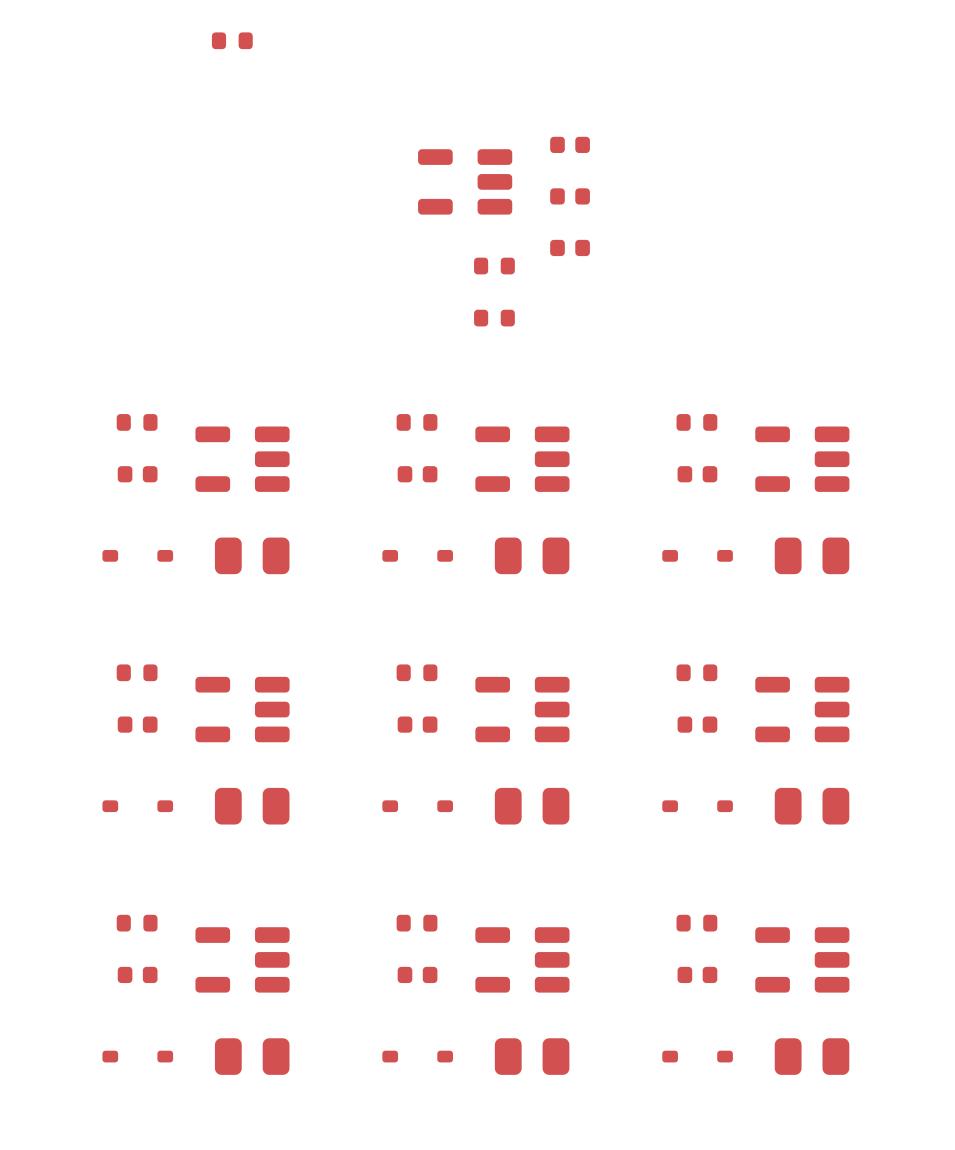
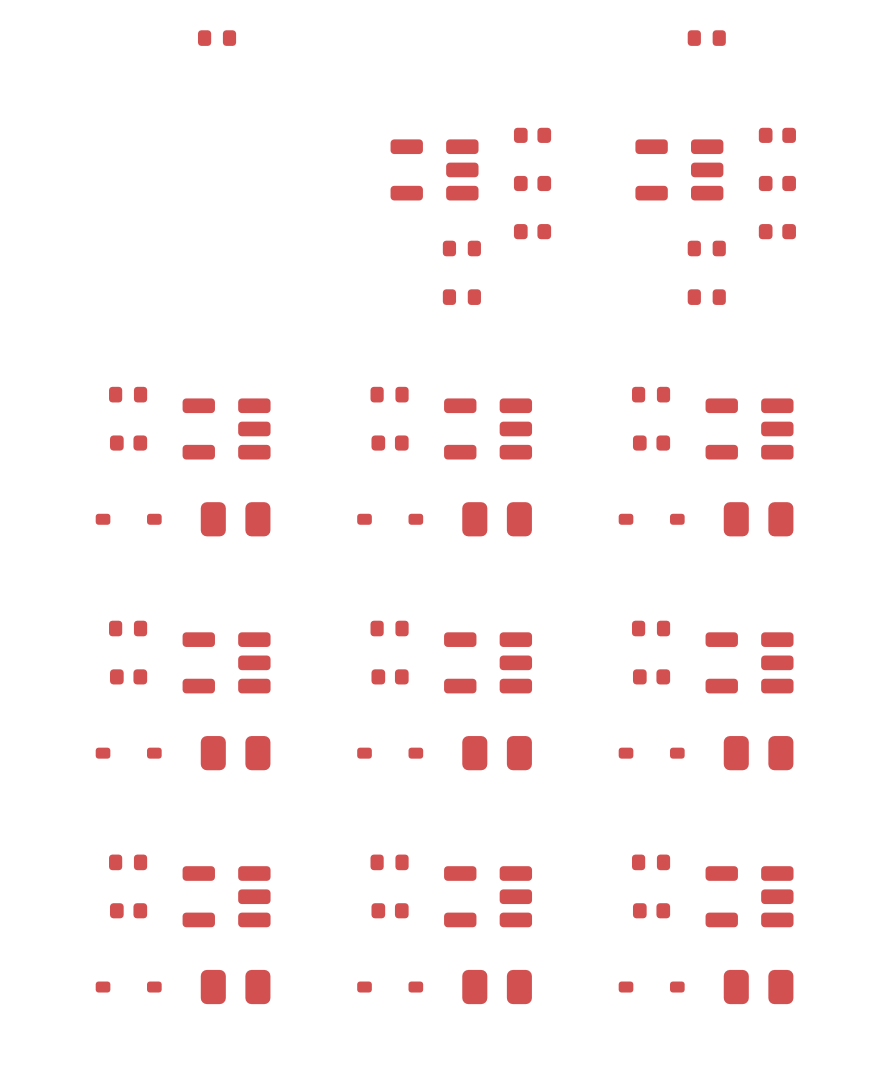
part: none -> (706, 38)
part: none -> (777, 135)
part: none -> (679, 169)
part: none -> (777, 183)
part: none -> (777, 231)
part: none -> (706, 248)
part: none -> (706, 297)

